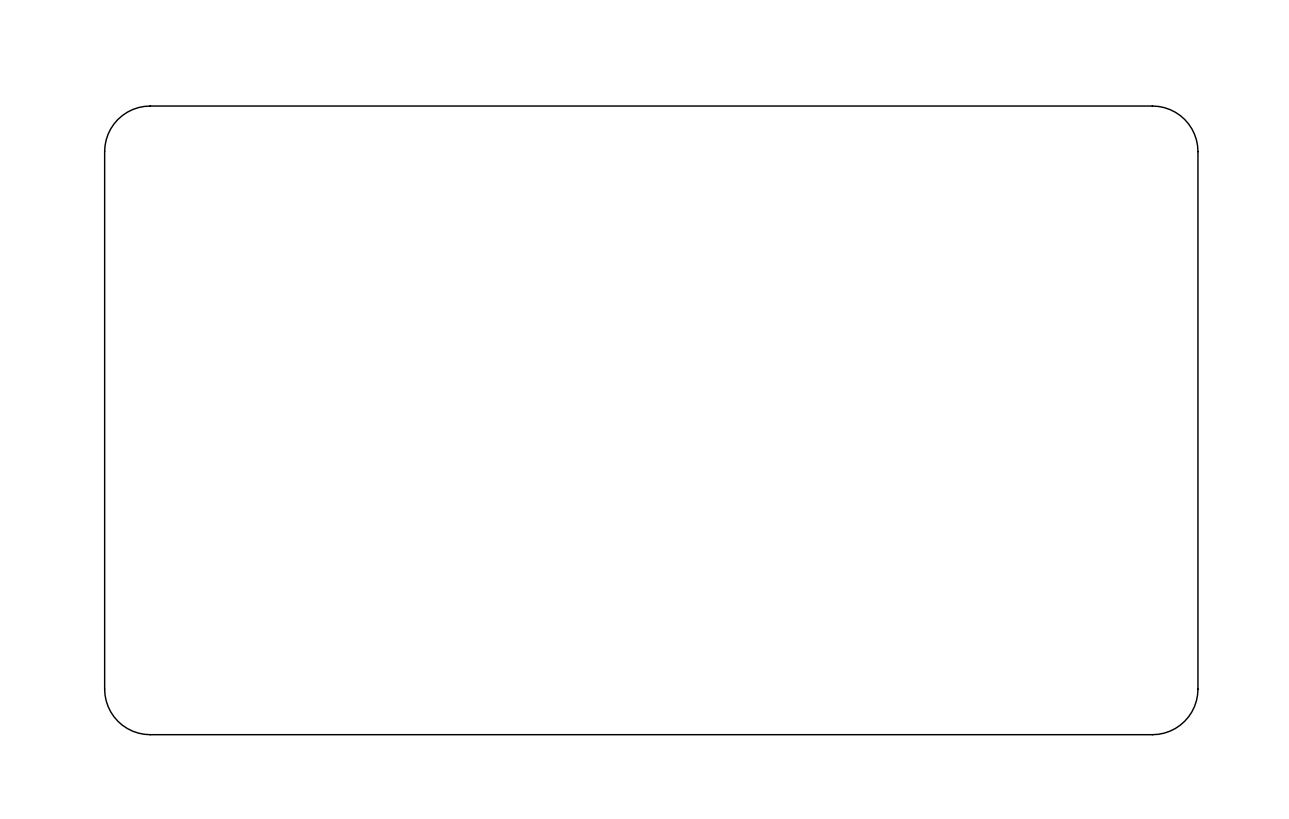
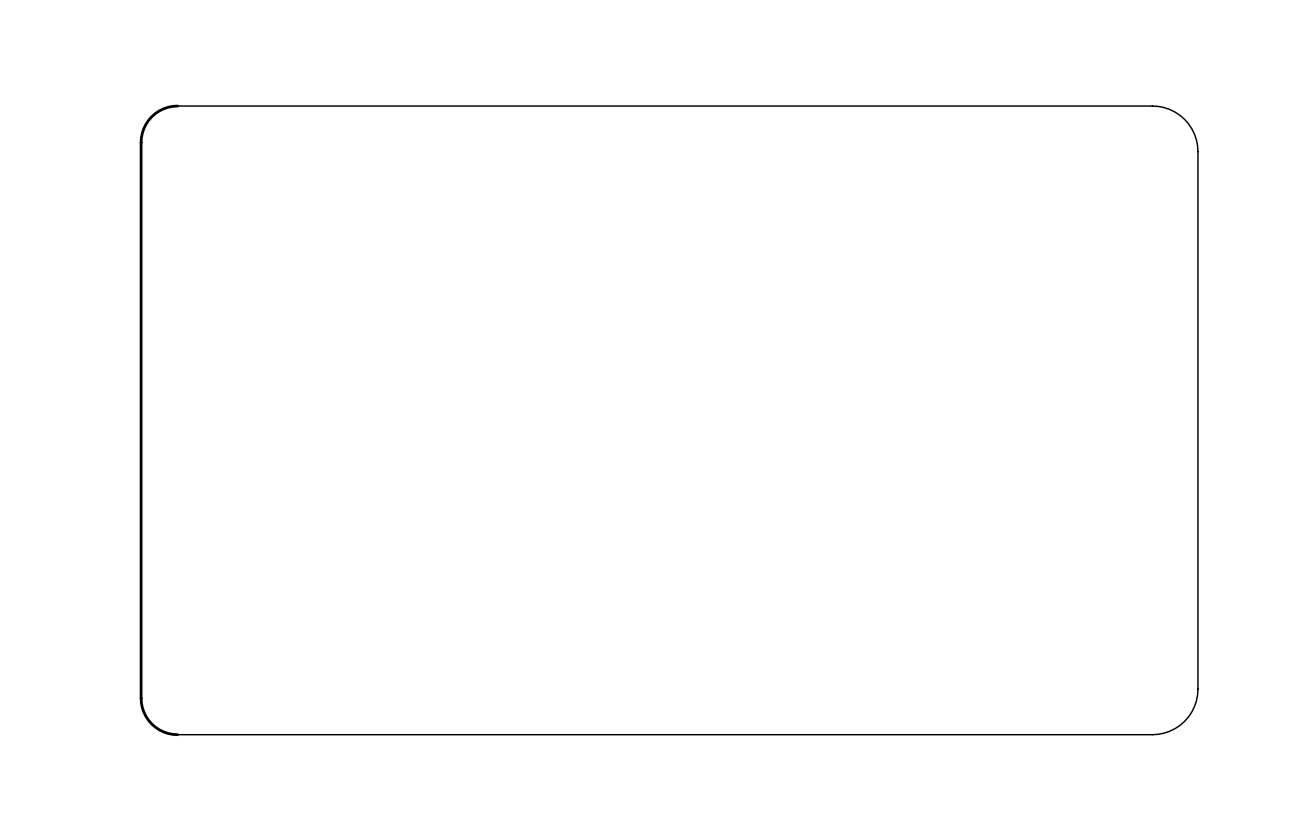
board edge: (177, 106) (144, 106) (127, 112) (117, 119) (110, 128) (106, 139) (104, 151) (105, 695) (110, 711) (117, 721) (127, 728) (144, 734) (177, 734) -> (177, 106) (163, 108) (151, 116) (143, 128) (141, 142) (141, 698) (143, 712) (151, 724) (163, 731) (177, 734)

